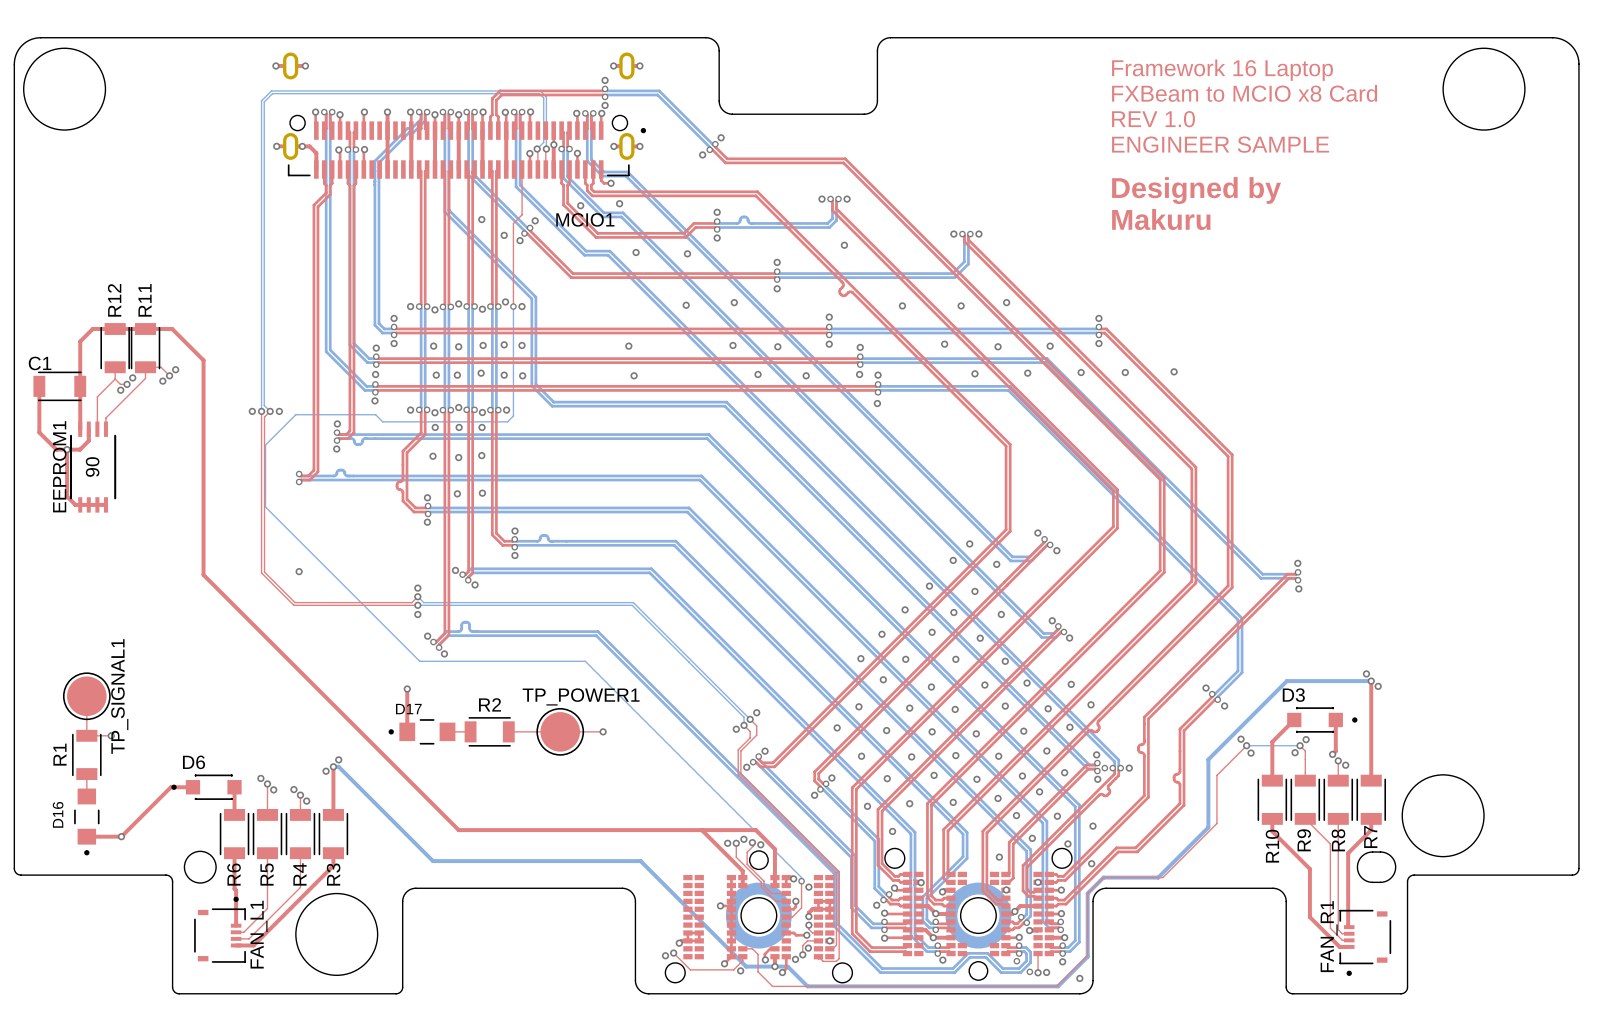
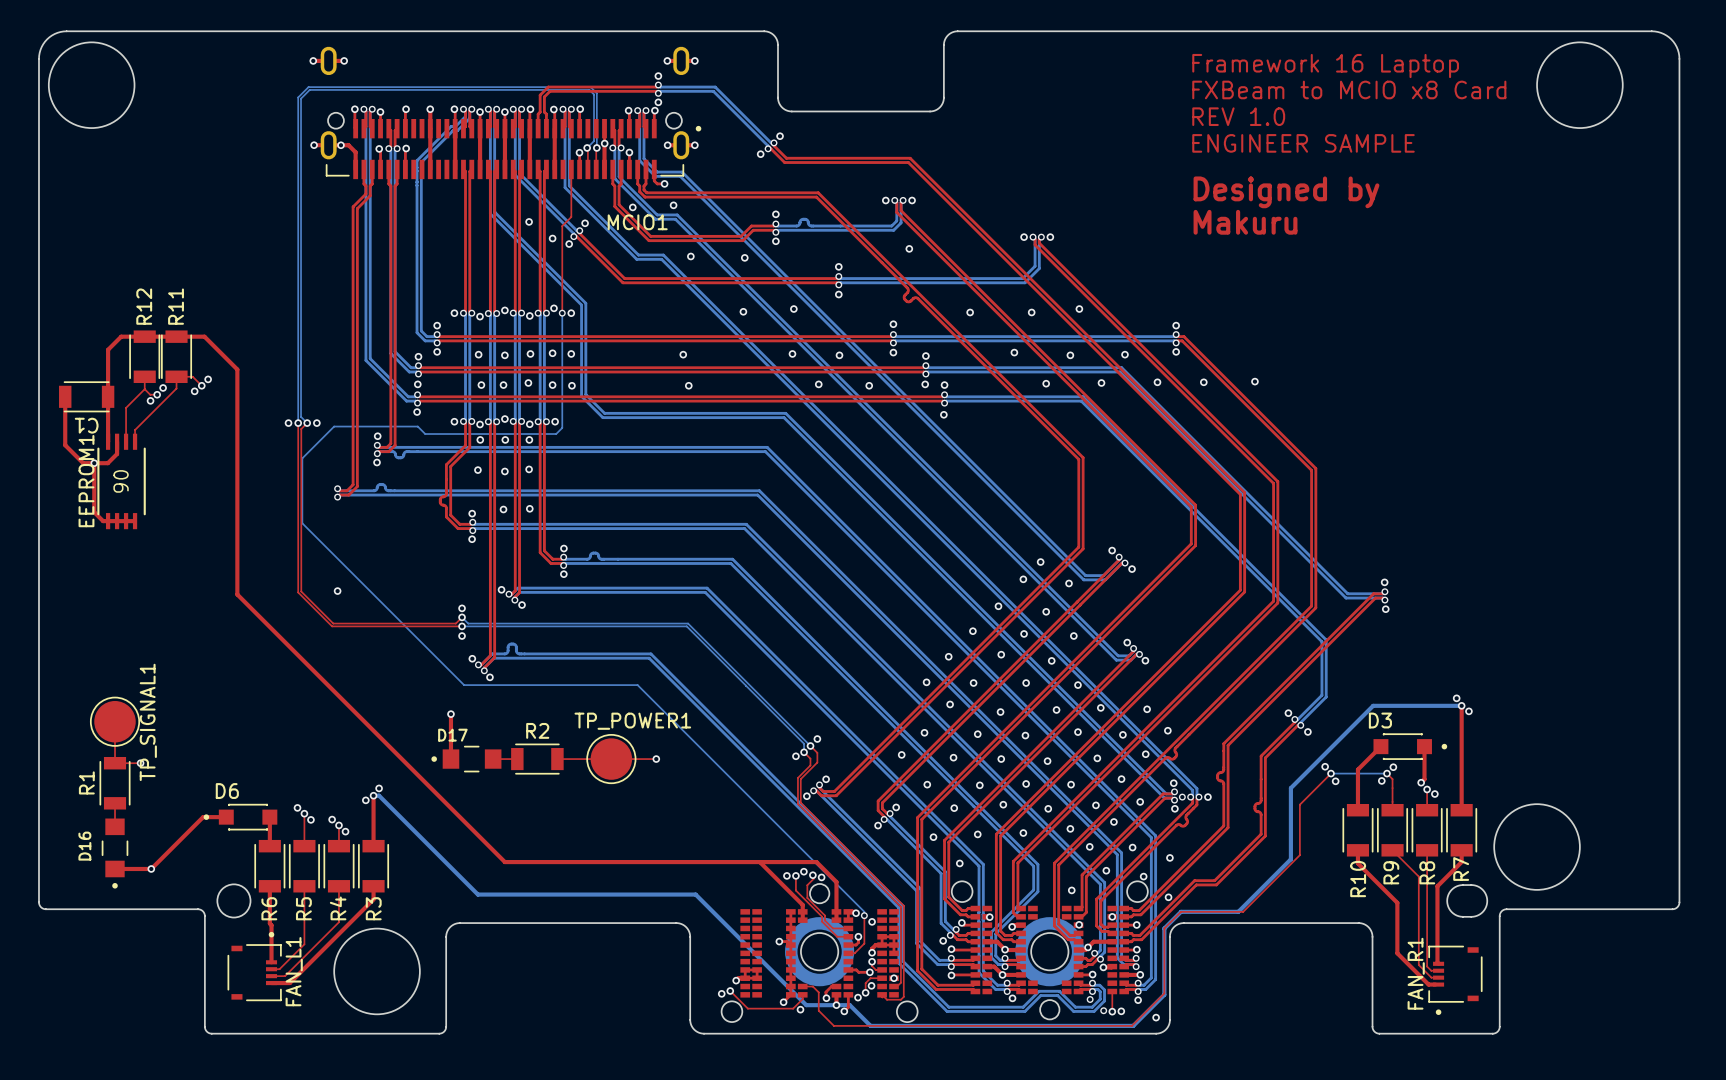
C1 name rotation: 0° (40, 363) -> 180° (86, 425)
C1 name position: C1 (40, 363) -> C1 (86, 425)

